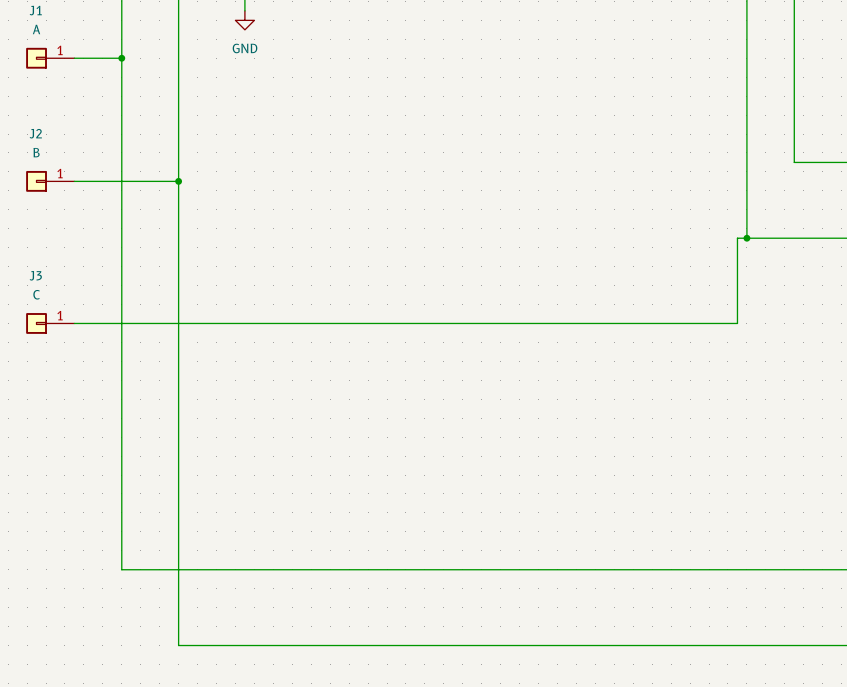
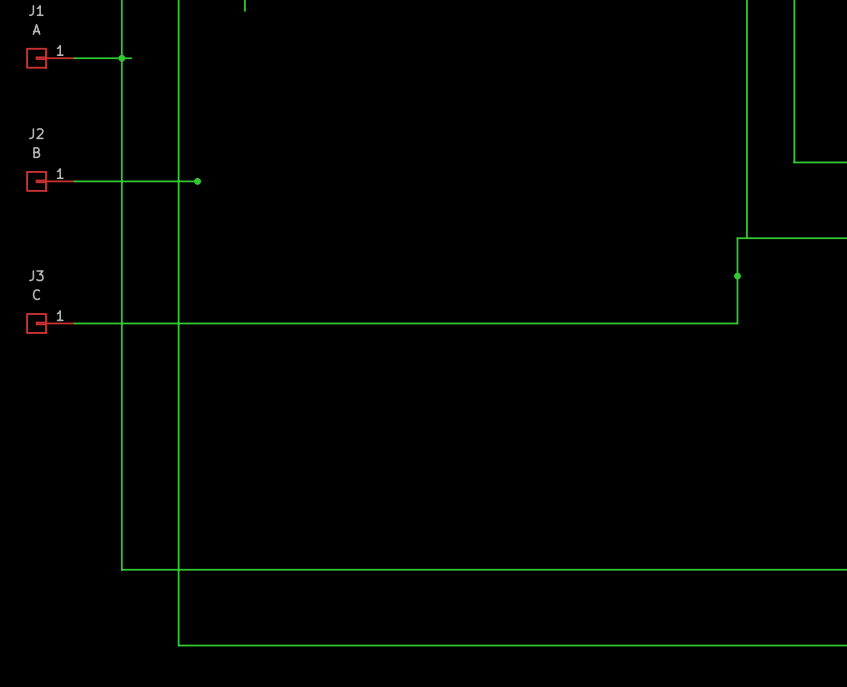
power symbol: GND (244, 20) -> none
wire: none -> (121, 58) (131, 58)
wire: none -> (178, 181) (197, 181)
junction position: (178, 181) -> (197, 181)
junction position: (746, 238) -> (737, 276)

